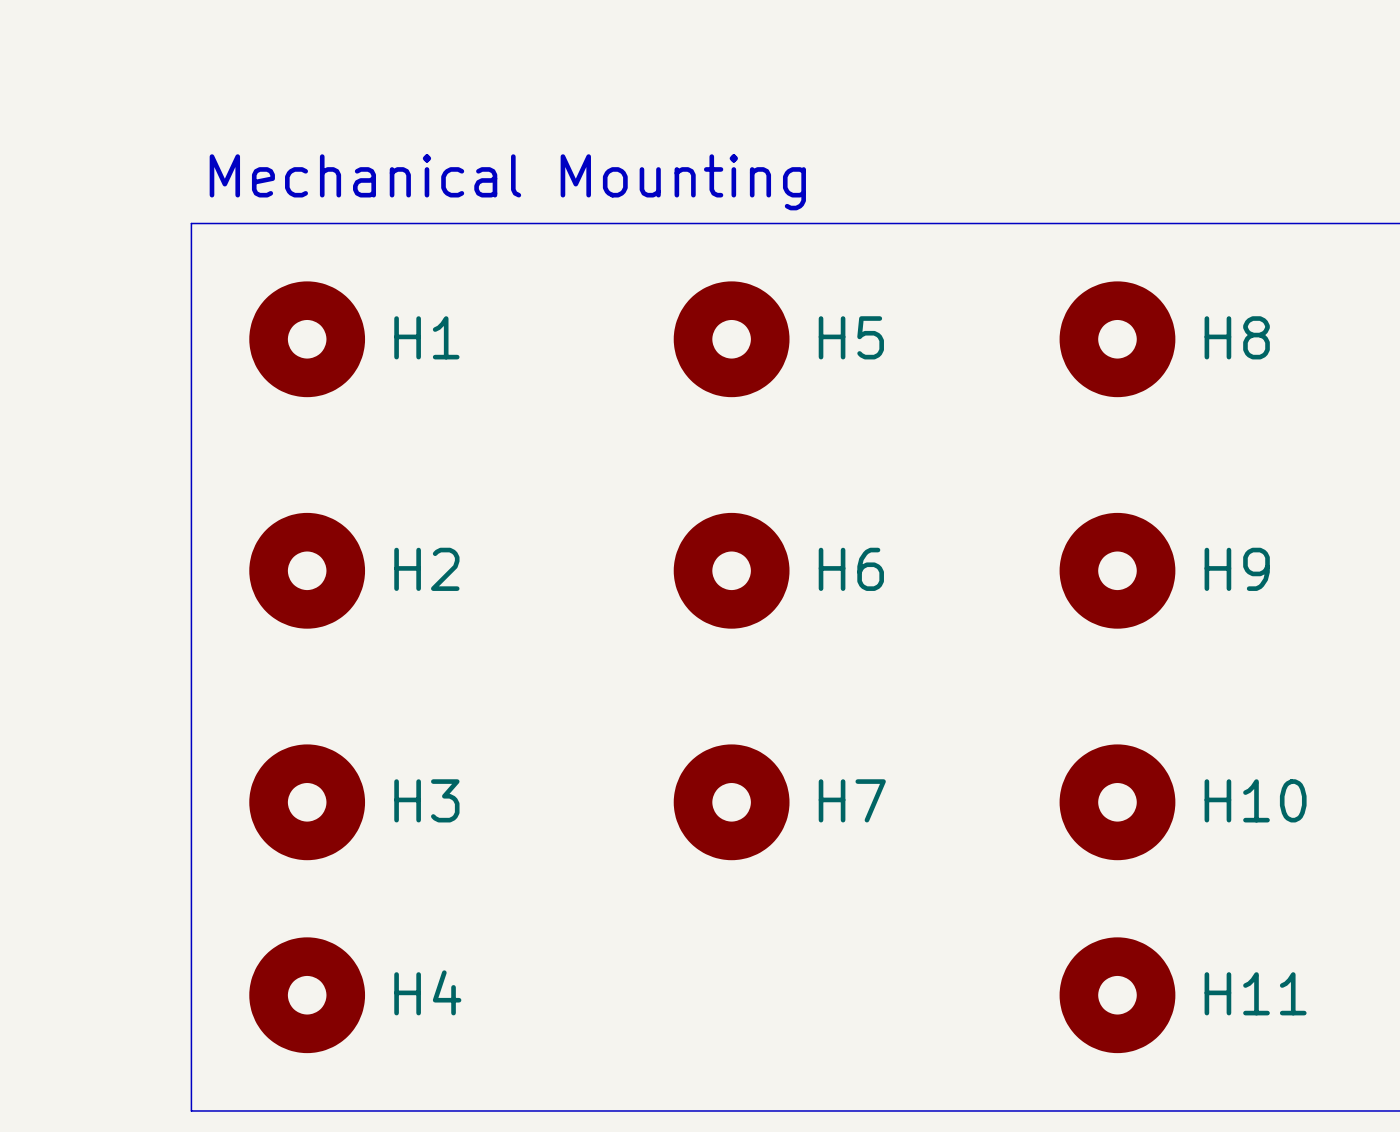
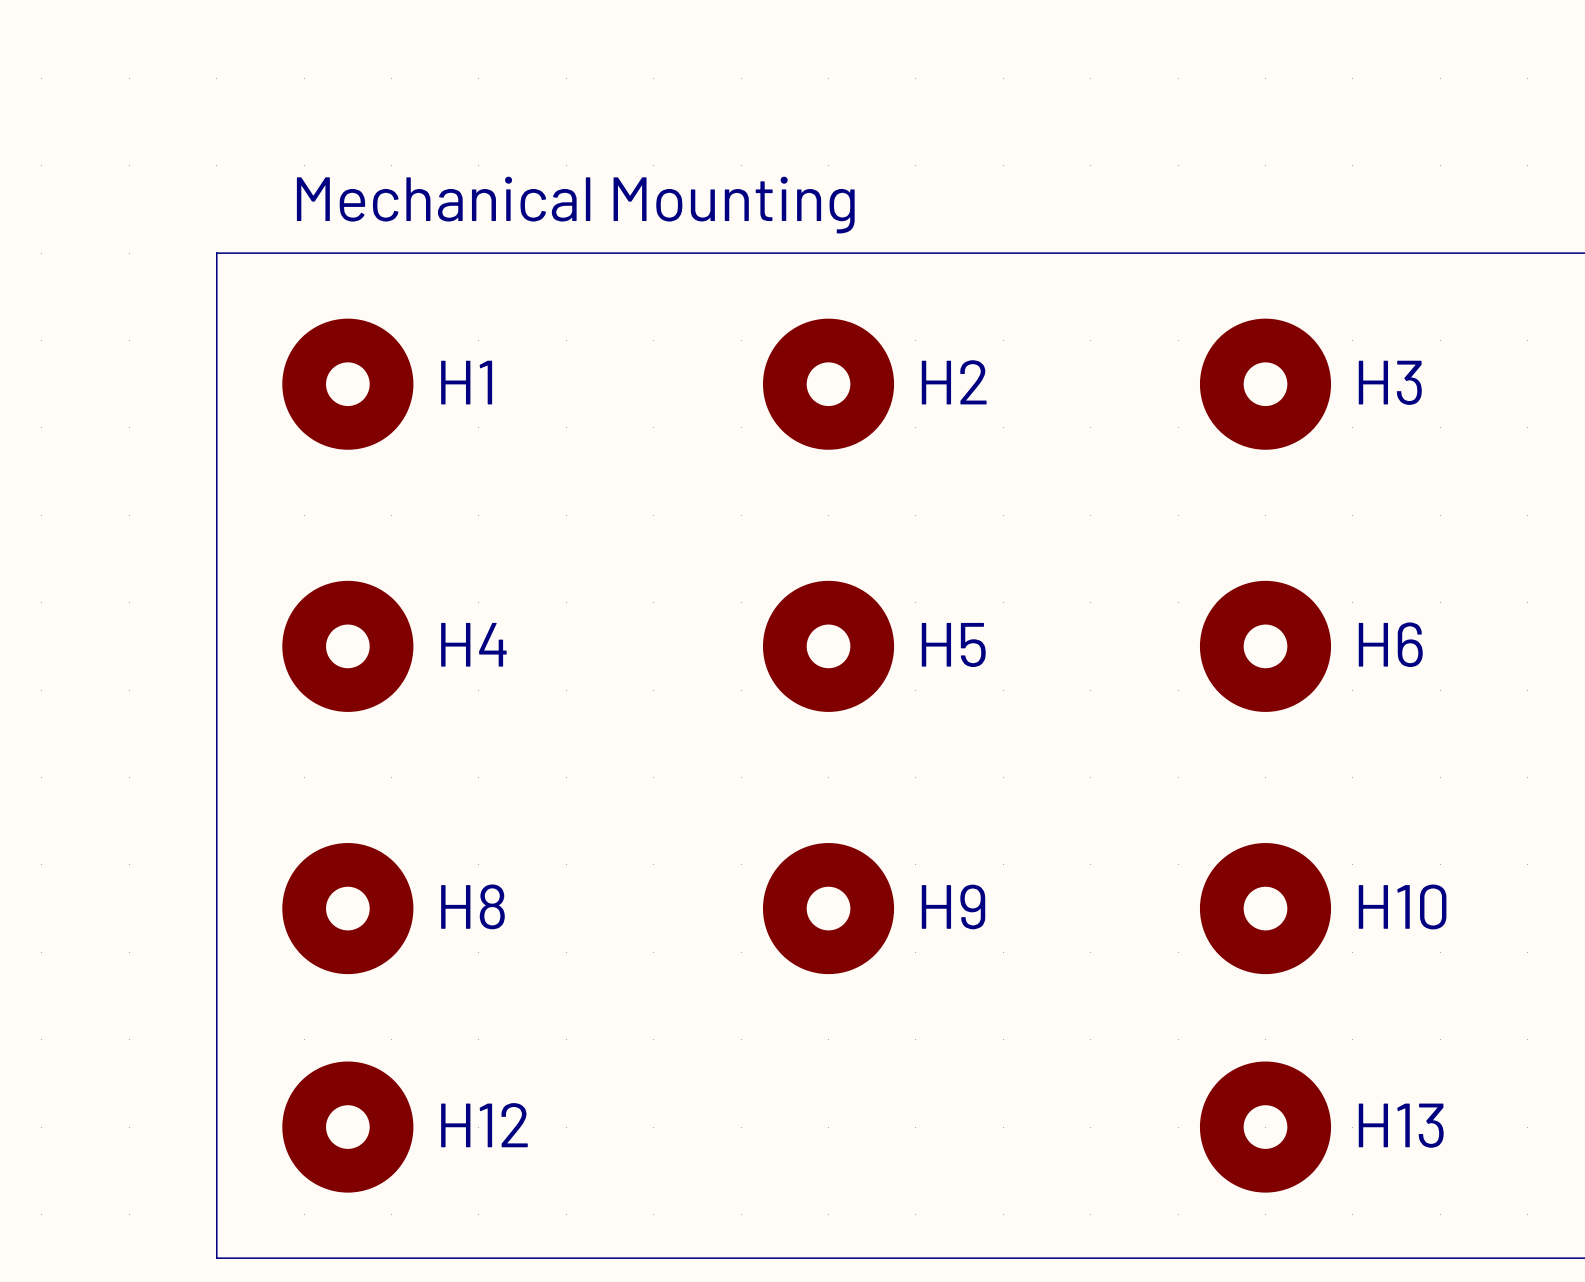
H5 name: H5 (851, 337) -> H2 (954, 382)
H8 name: H8 (1237, 337) -> H3 (1390, 382)
H2 name: H2 (426, 569) -> H4 (473, 644)
H6 name: H6 (851, 569) -> H5 (953, 644)
H9 name: H9 (1237, 569) -> H6 (1390, 644)
H3 name: H3 (426, 800) -> H8 (472, 906)
H7 name: H7 (852, 800) -> H9 (953, 906)
H4 name: H4 (427, 992) -> H12 (484, 1125)
H11 name: H11 (1255, 993) -> H13 (1401, 1125)

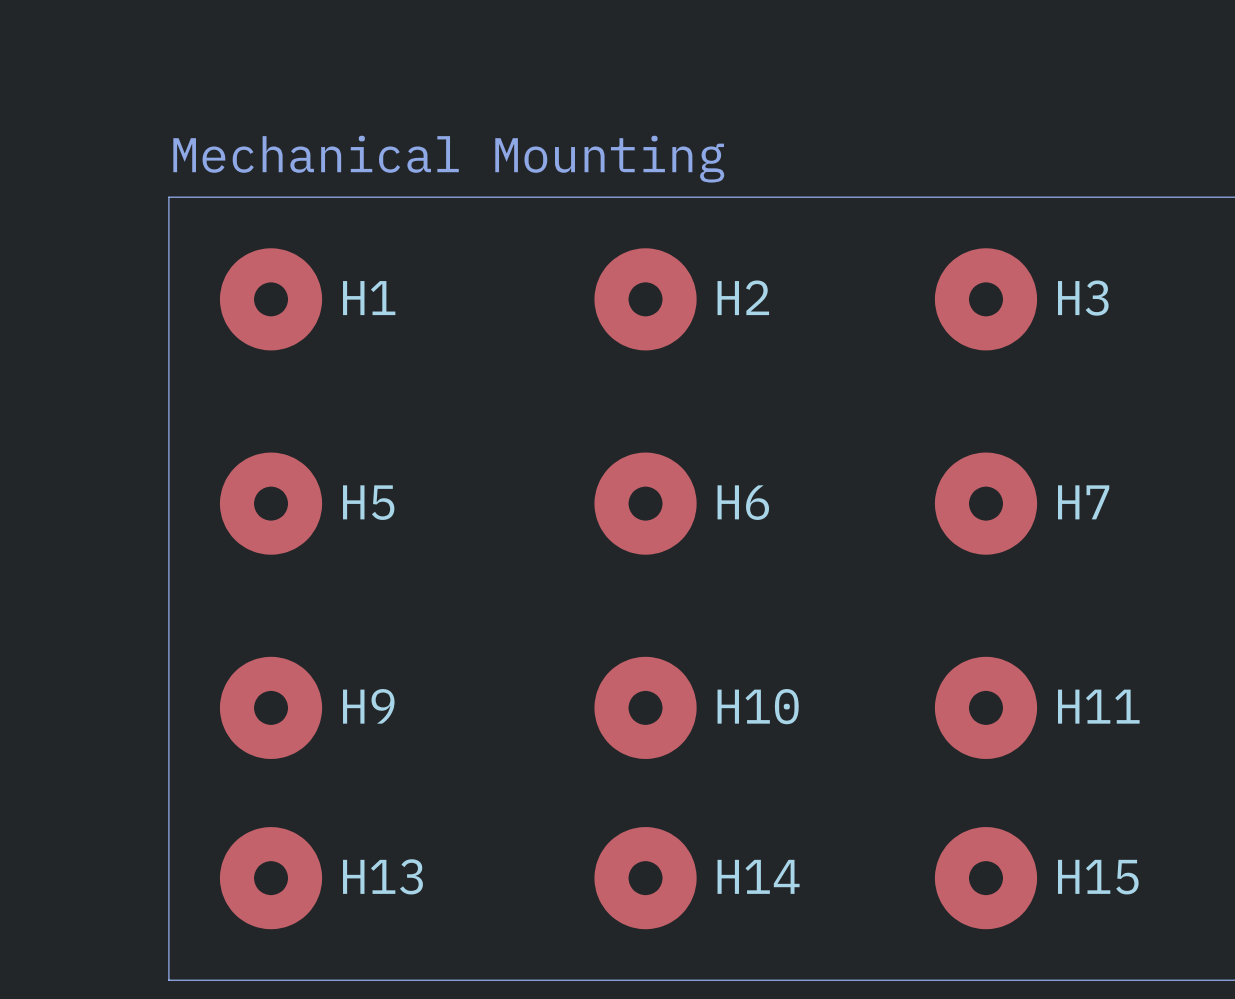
H4 name: H4 (473, 644) -> H5 (368, 502)
H5 name: H5 (953, 644) -> H6 (743, 502)
H6 name: H6 (1390, 644) -> H7 (1083, 502)
H8 name: H8 (472, 906) -> H9 (368, 706)
H9 name: H9 (953, 906) -> H10 (758, 706)
H10 name: H10 (1402, 906) -> H11 (1098, 706)
H12 name: H12 (484, 1125) -> H13 (382, 876)
H13 name: H13 (1401, 1125) -> H15 (1098, 877)
H14: none -> (645, 878)

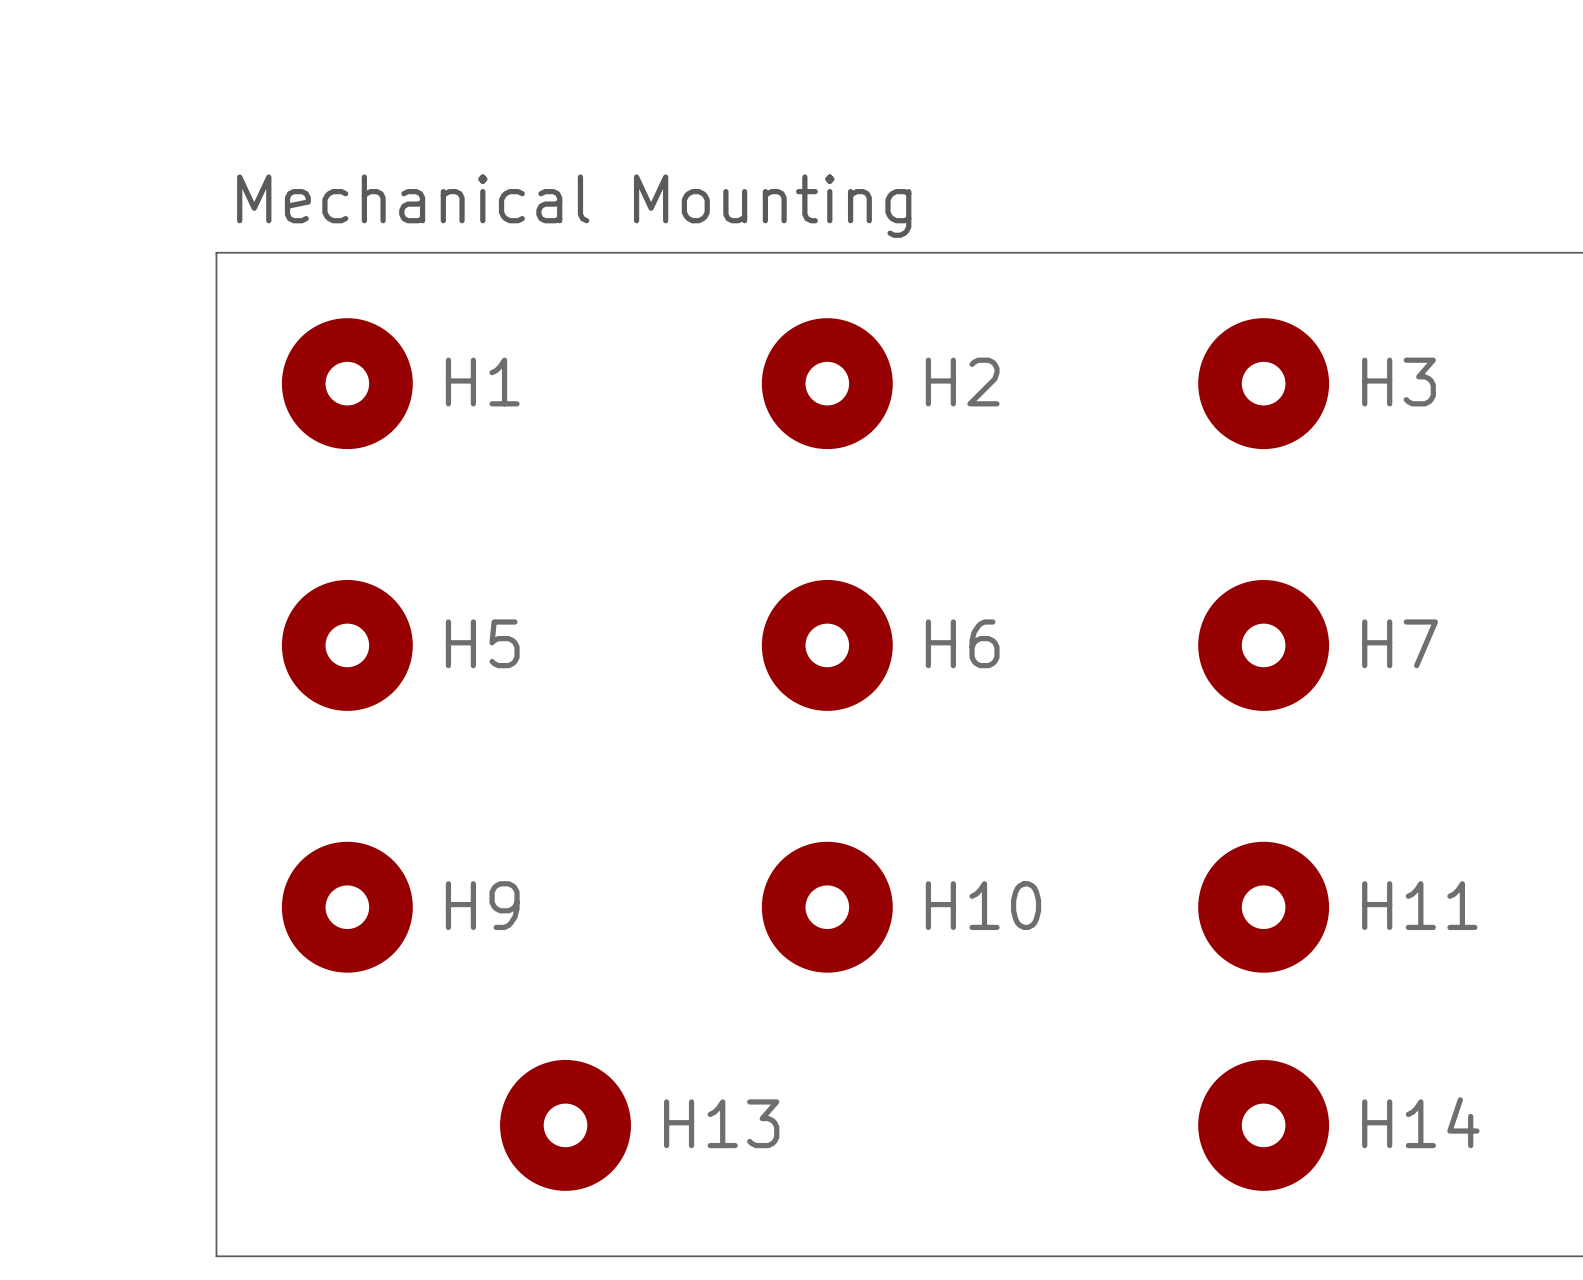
H15 name: H15 (1098, 877) -> H14 (1420, 1122)
H13 position: (271, 878) -> (565, 1125)
H14: (645, 878) -> none

